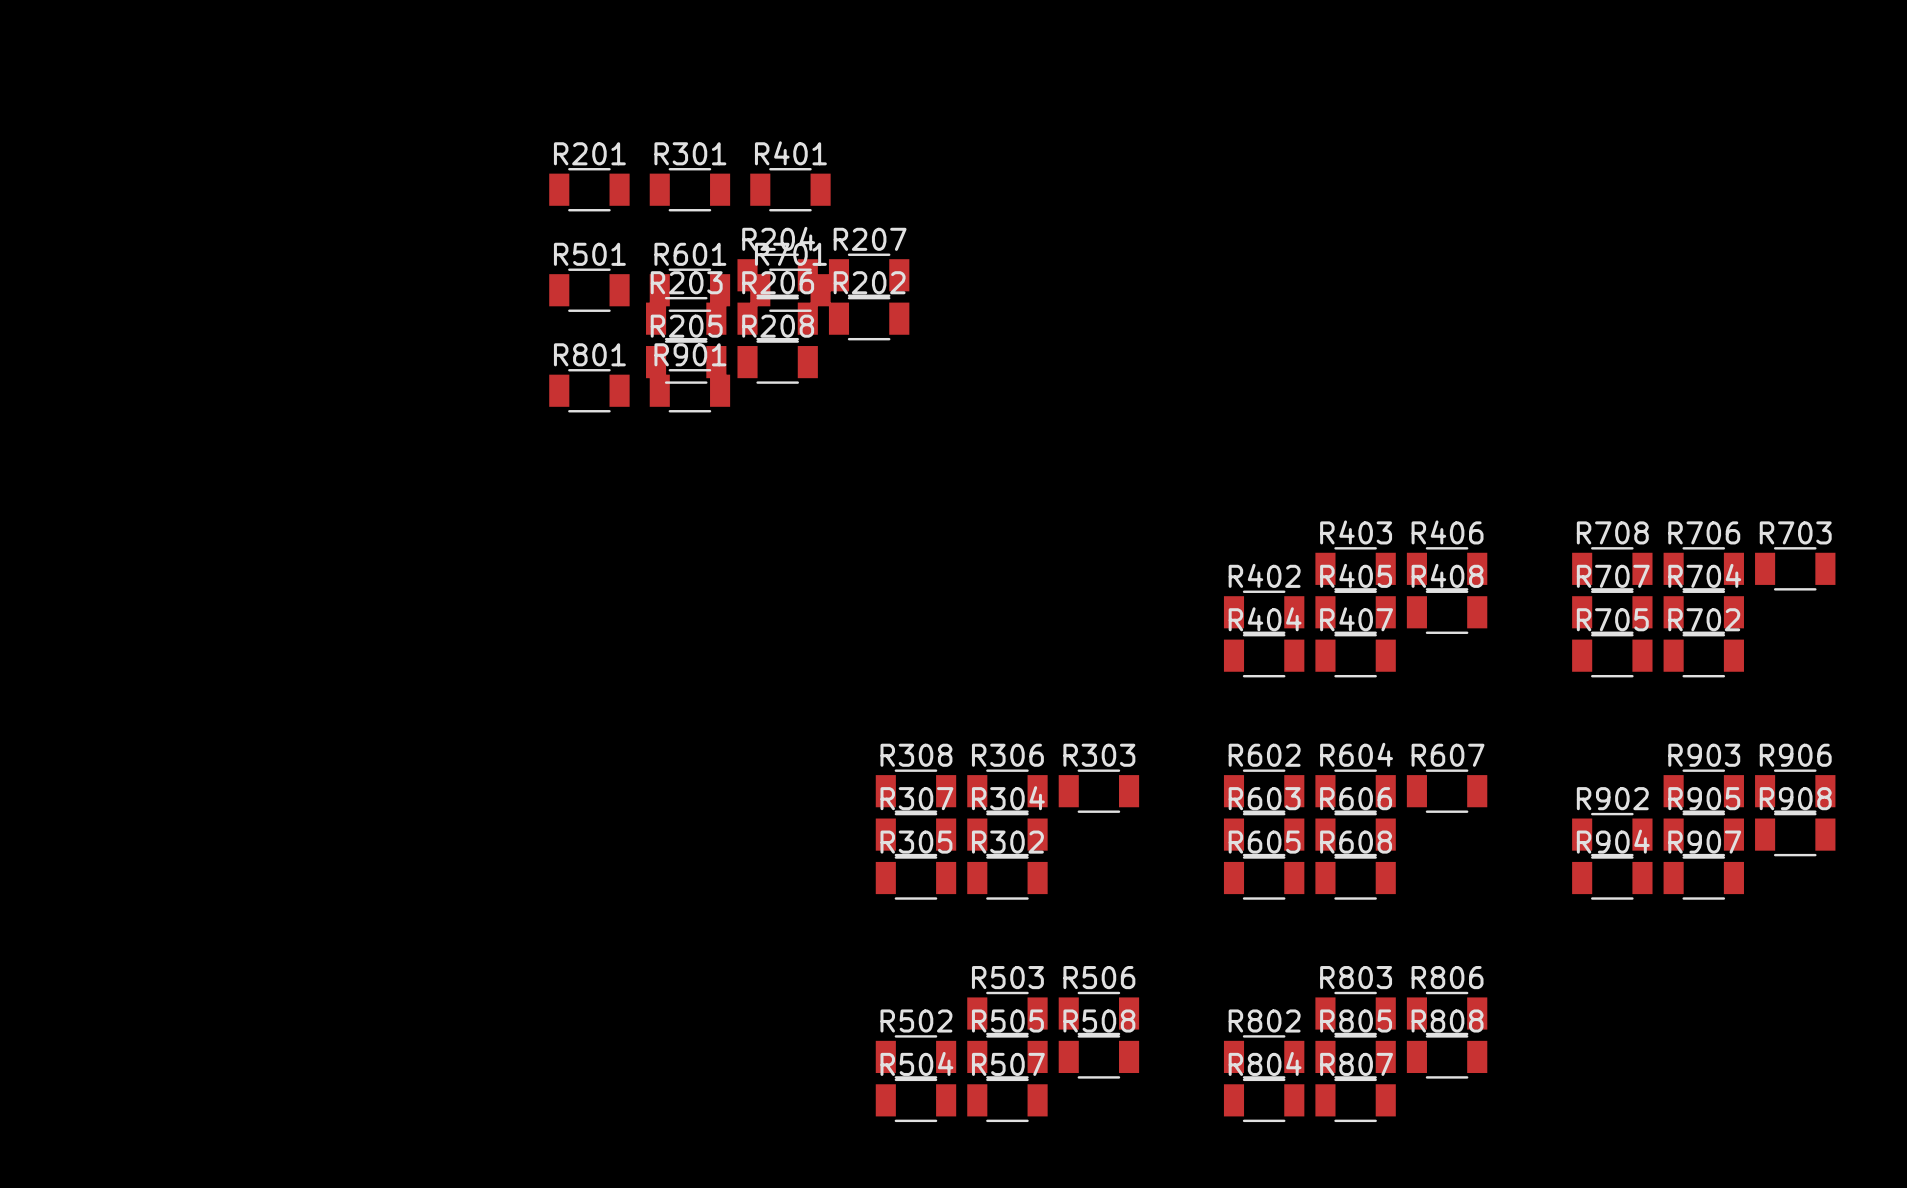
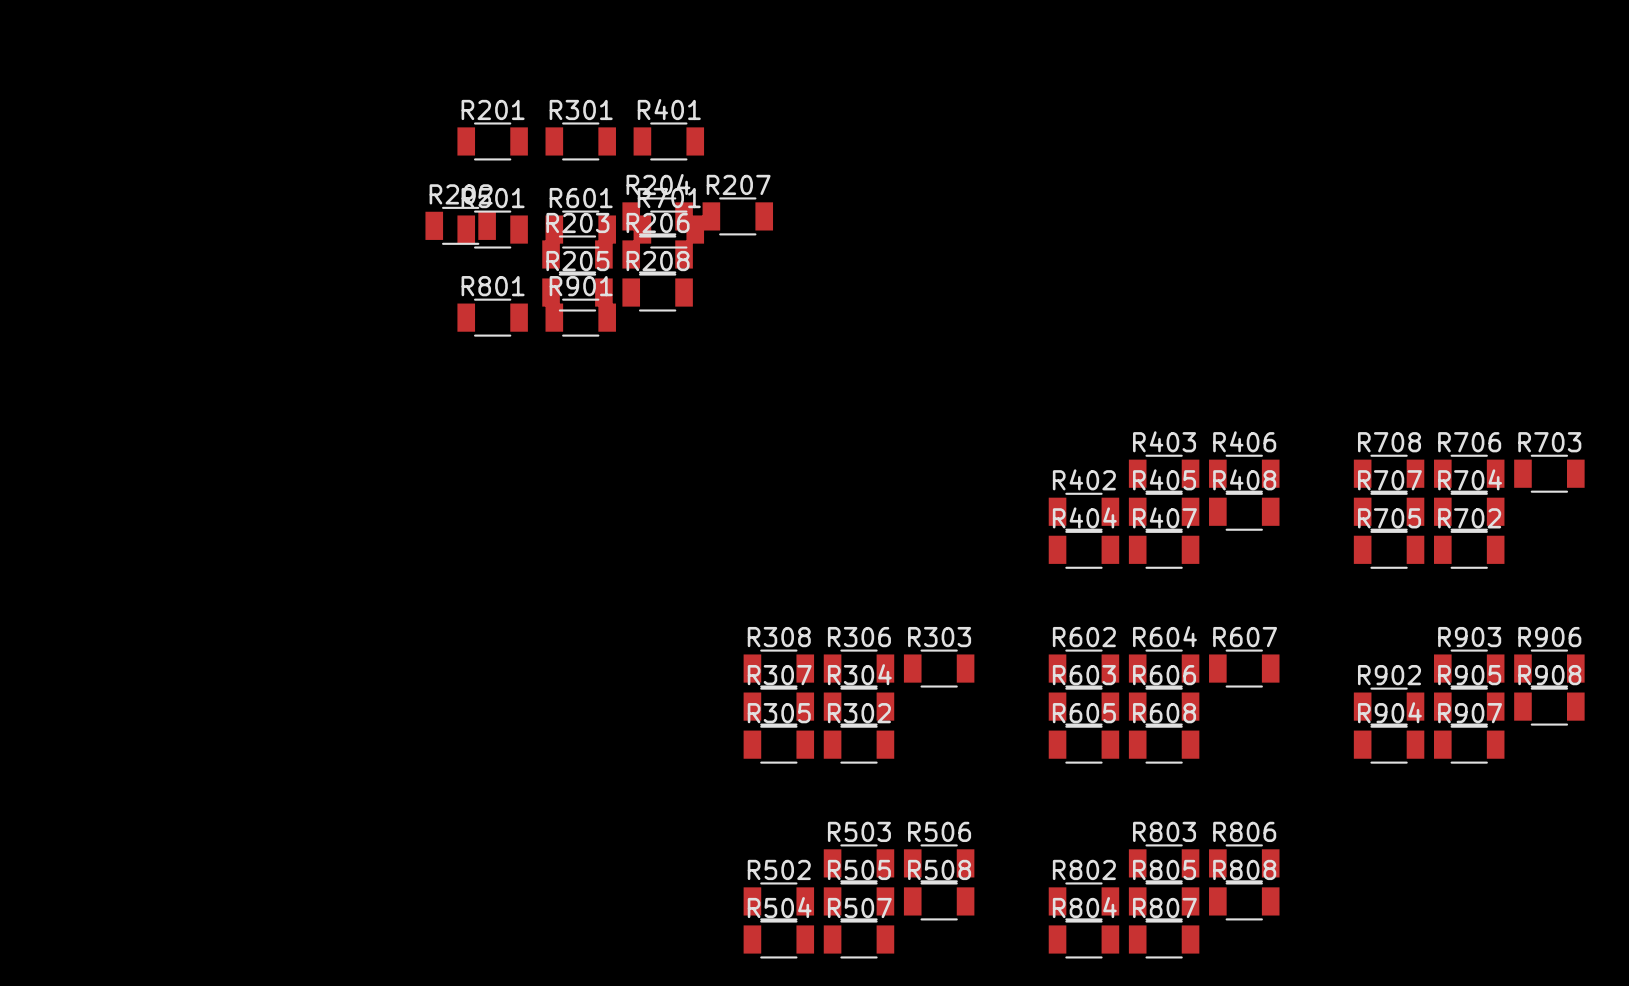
R202 position: (869, 318) -> (460, 225)

